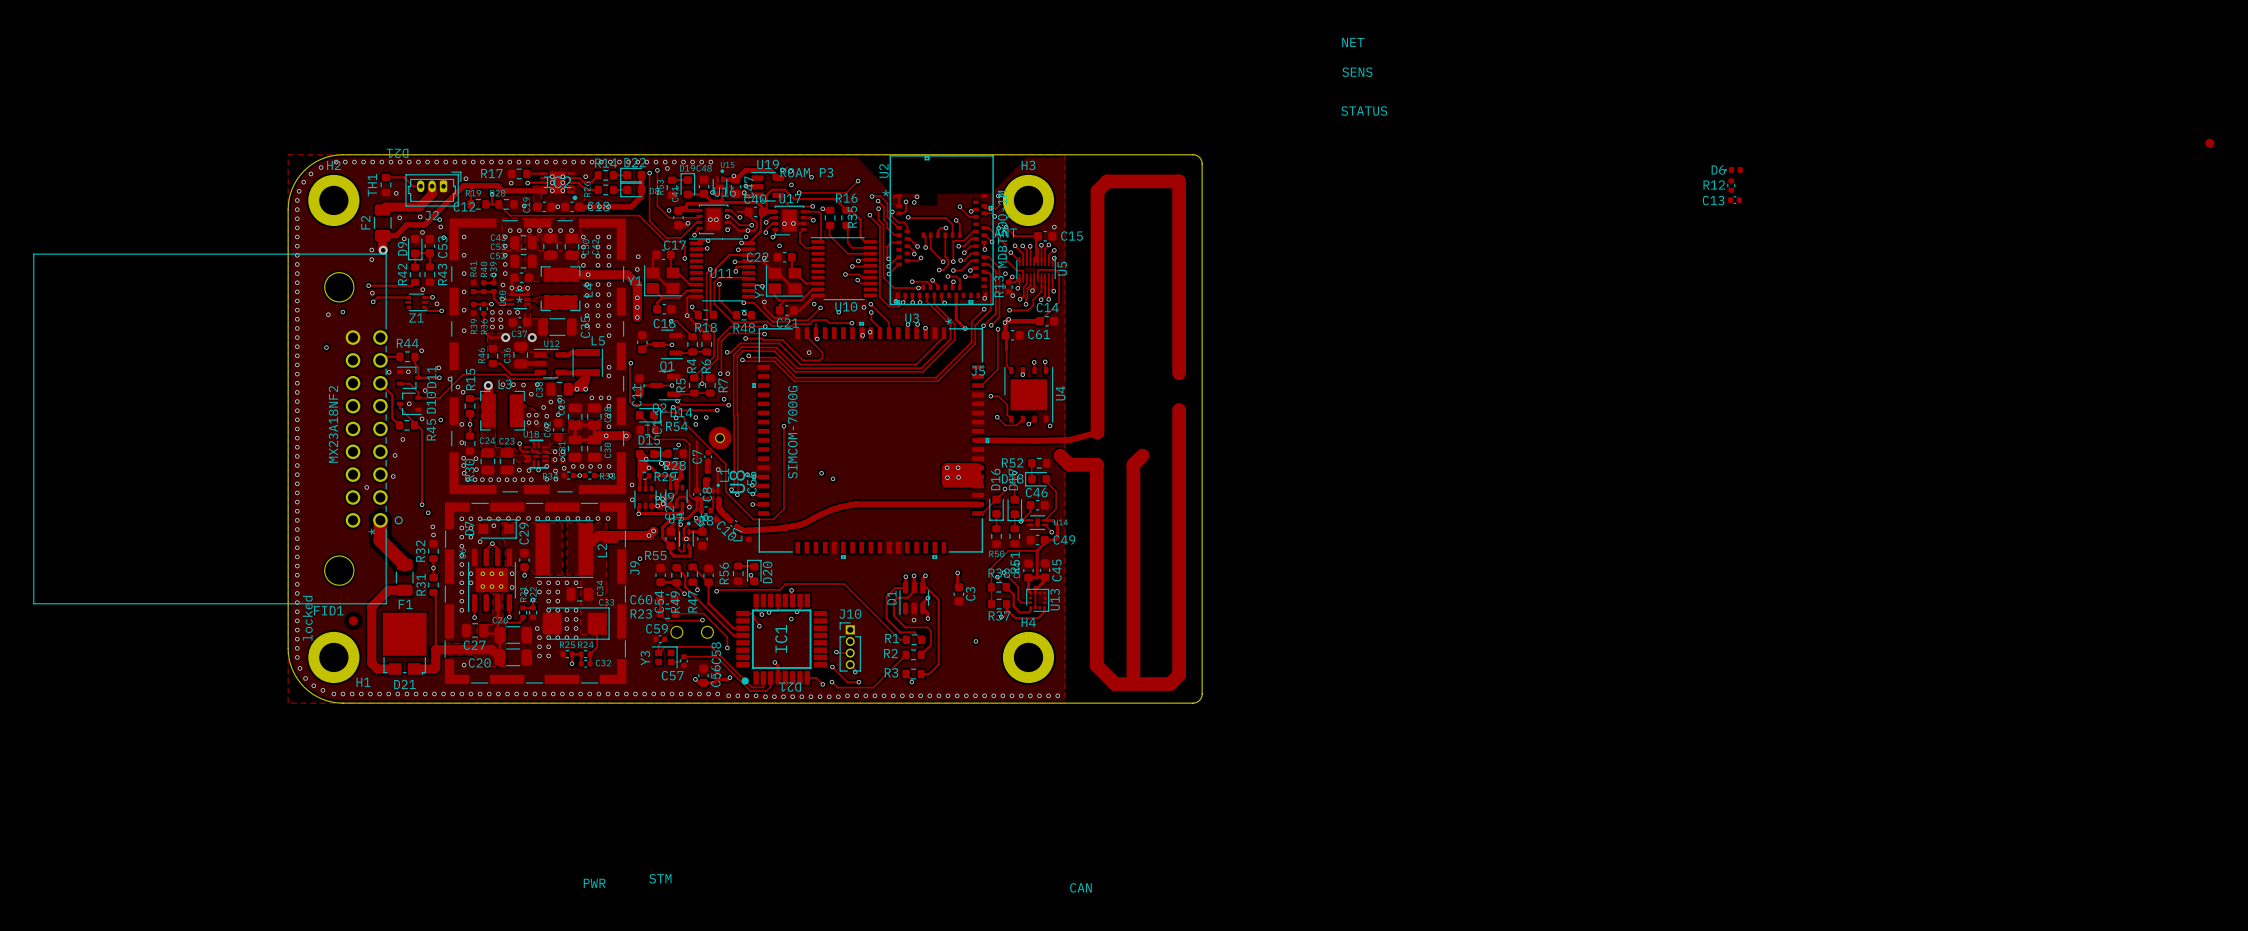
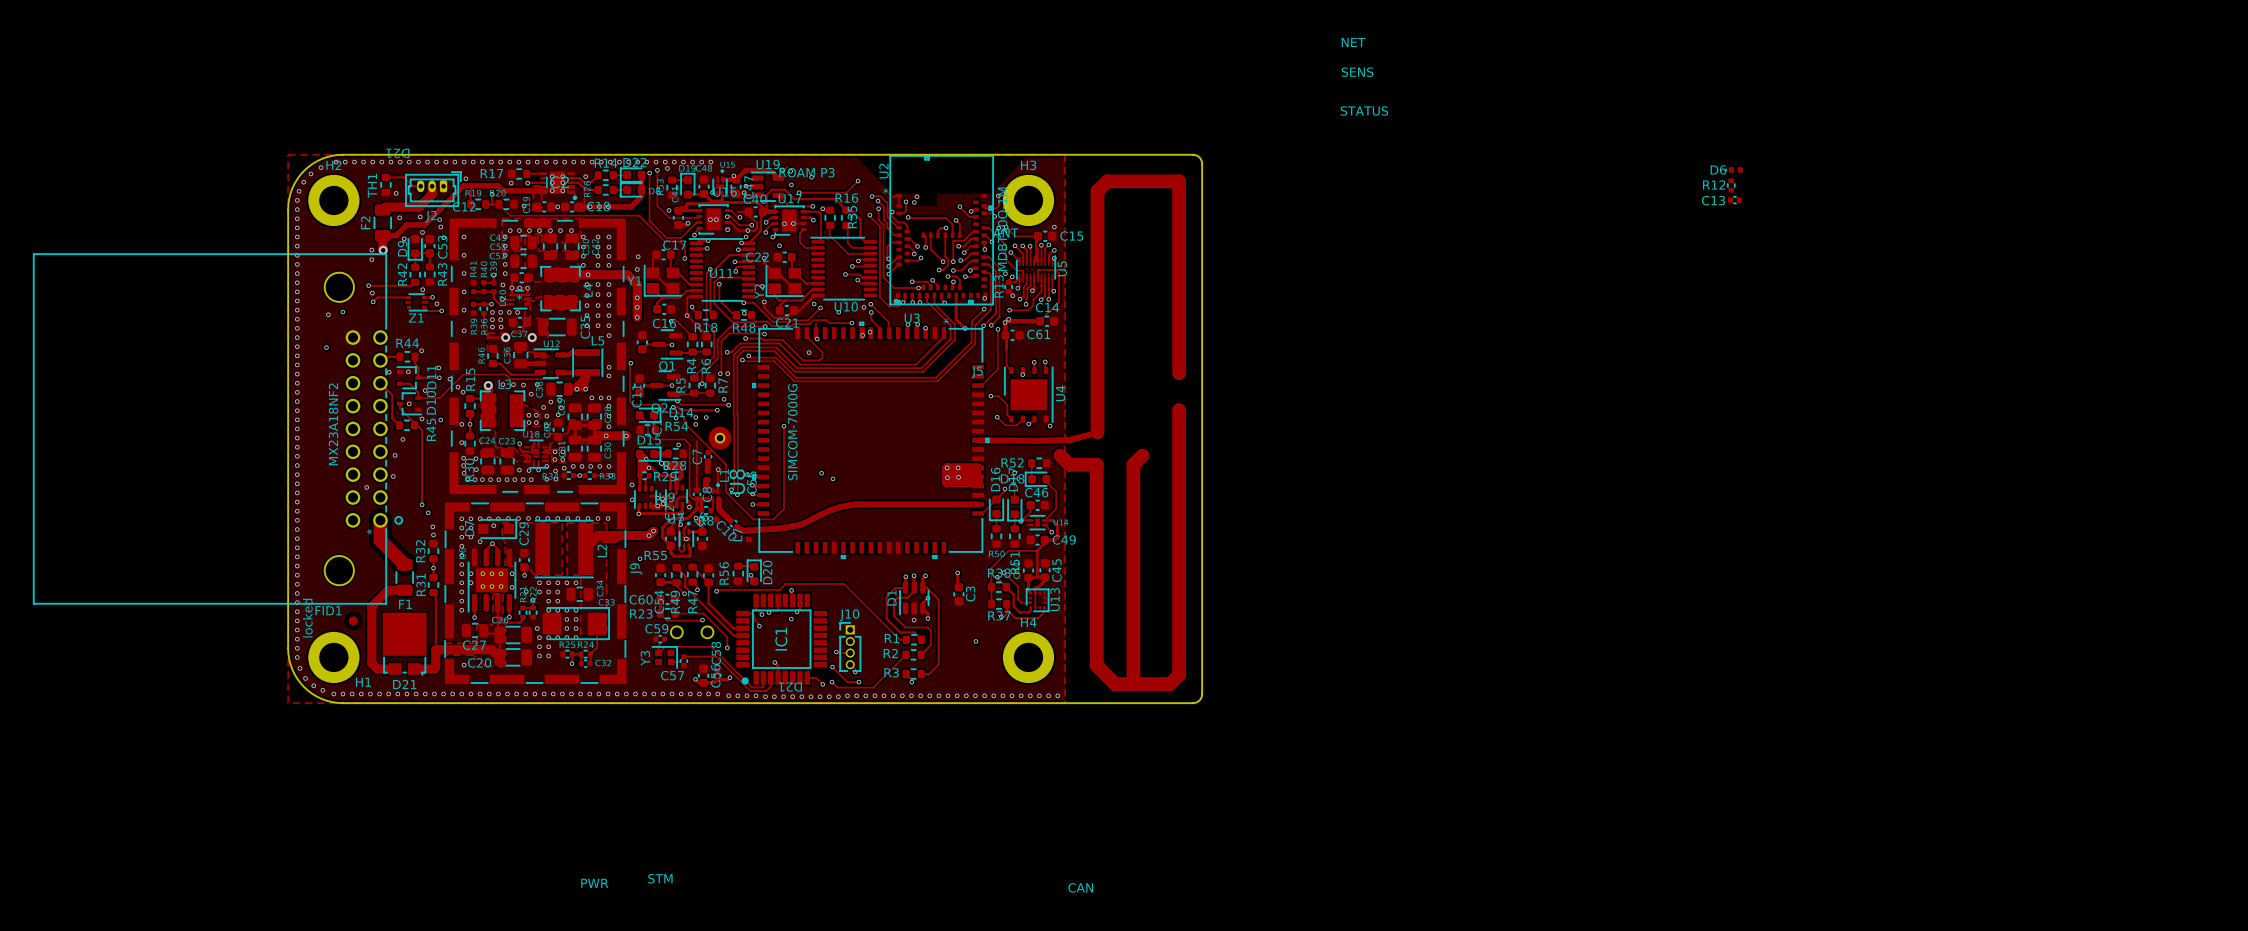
part: (2209, 143) -> none

